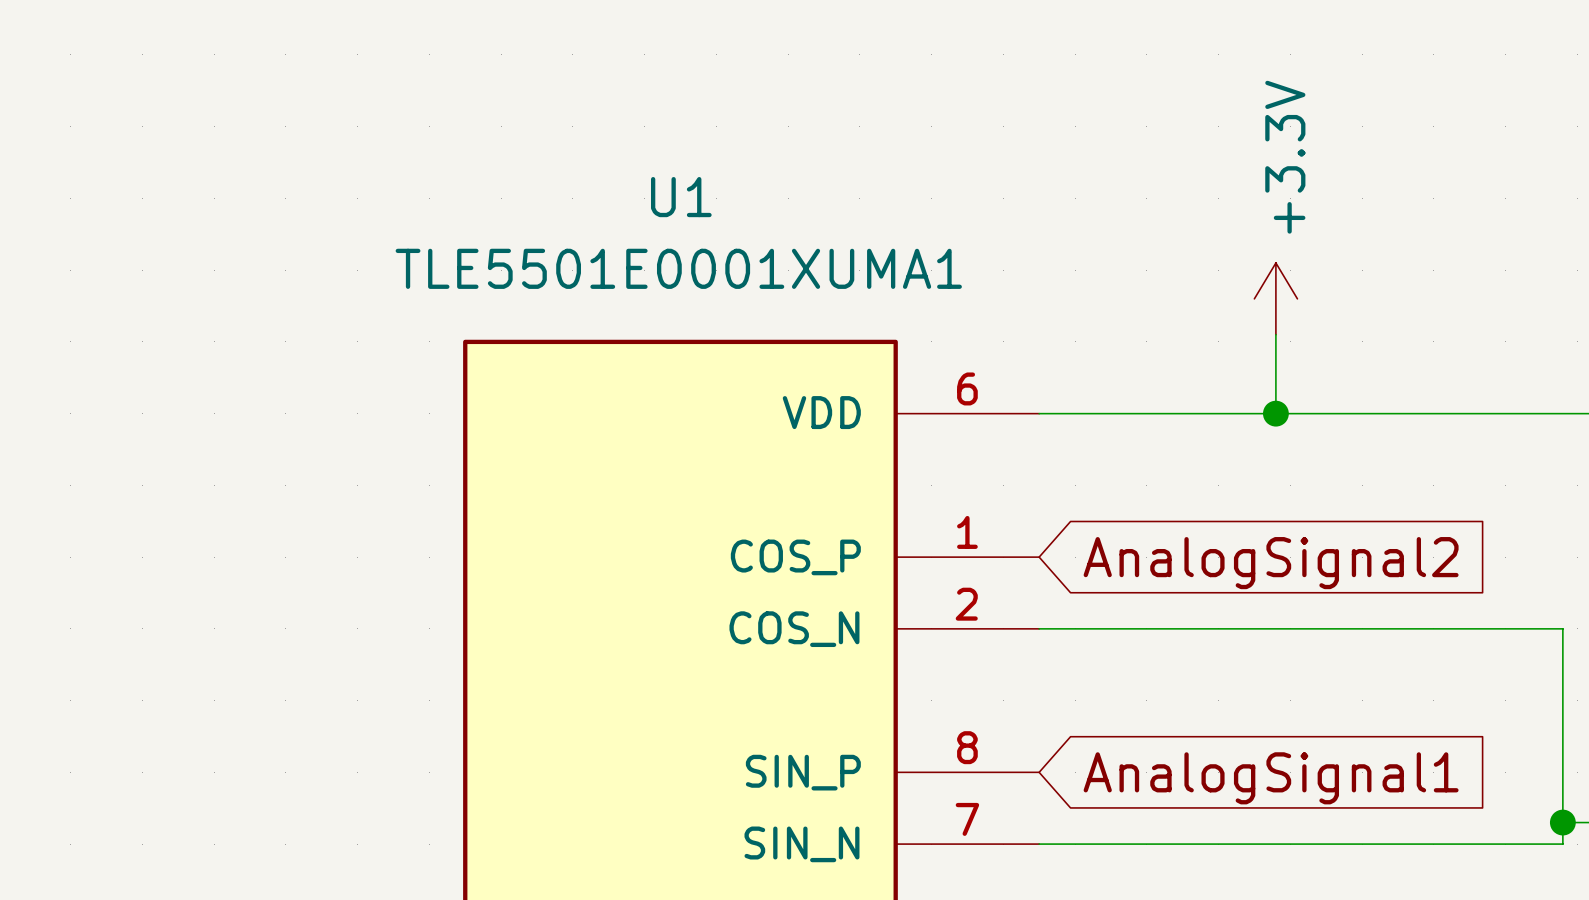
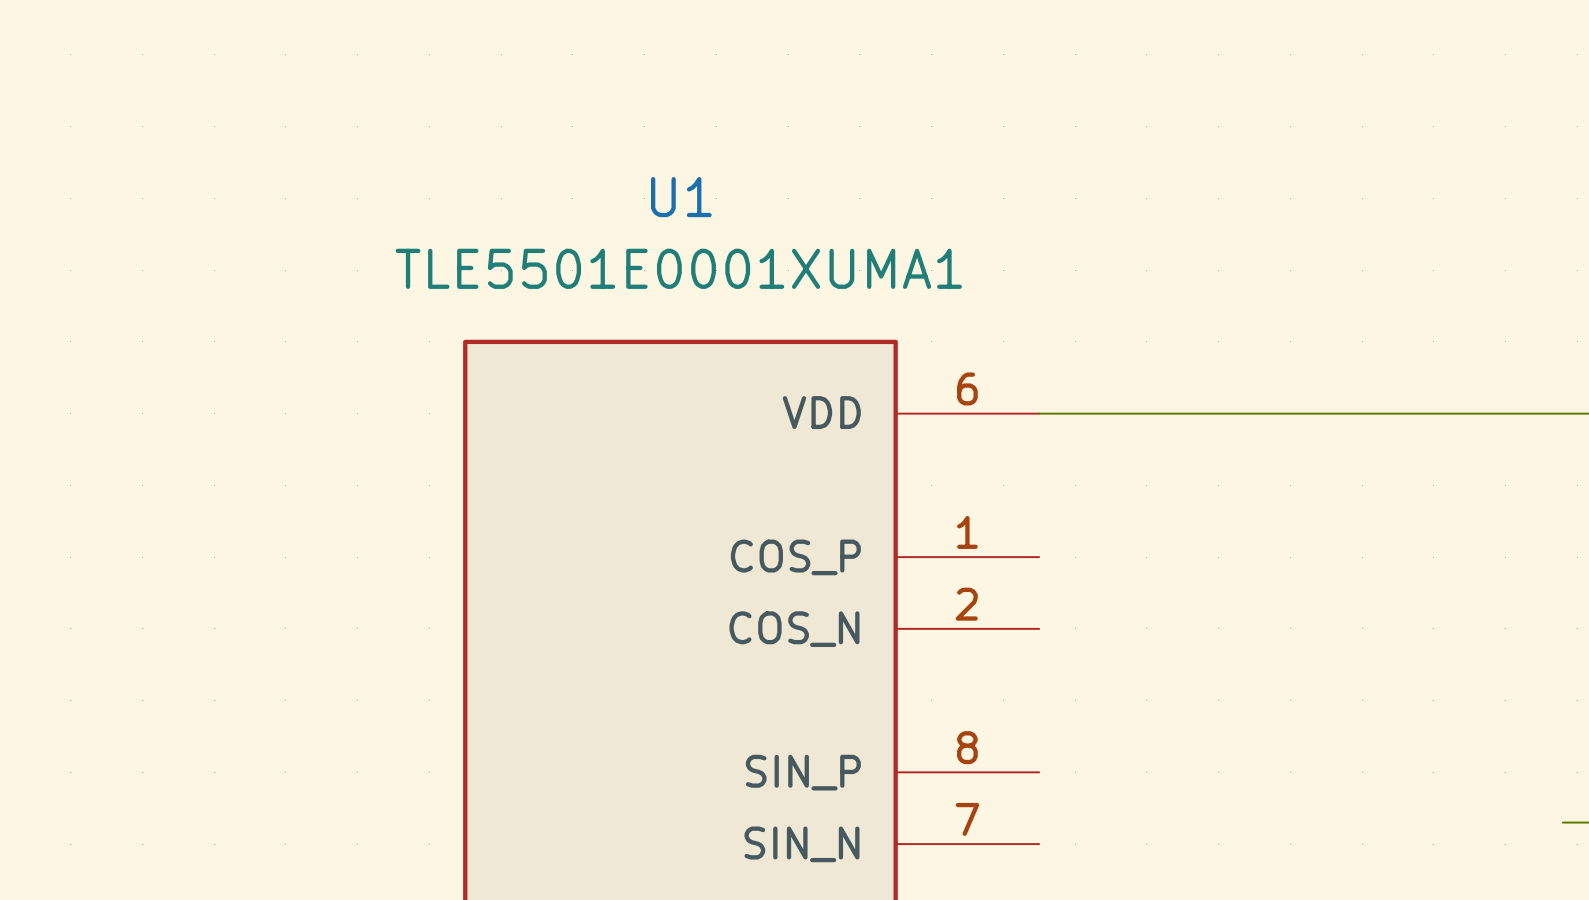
power symbol: +3.3V (1275, 298) -> none
wire: (1275, 334) (1275, 413) -> none
junction: (1275, 413) -> none
global label: AnalogSignal2 (1271, 563) -> none
wire: (1039, 628) (1562, 628) (1562, 844) (1039, 844) -> none
global label: AnalogSignal1 (1271, 778) -> none
junction: (1562, 822) -> none

